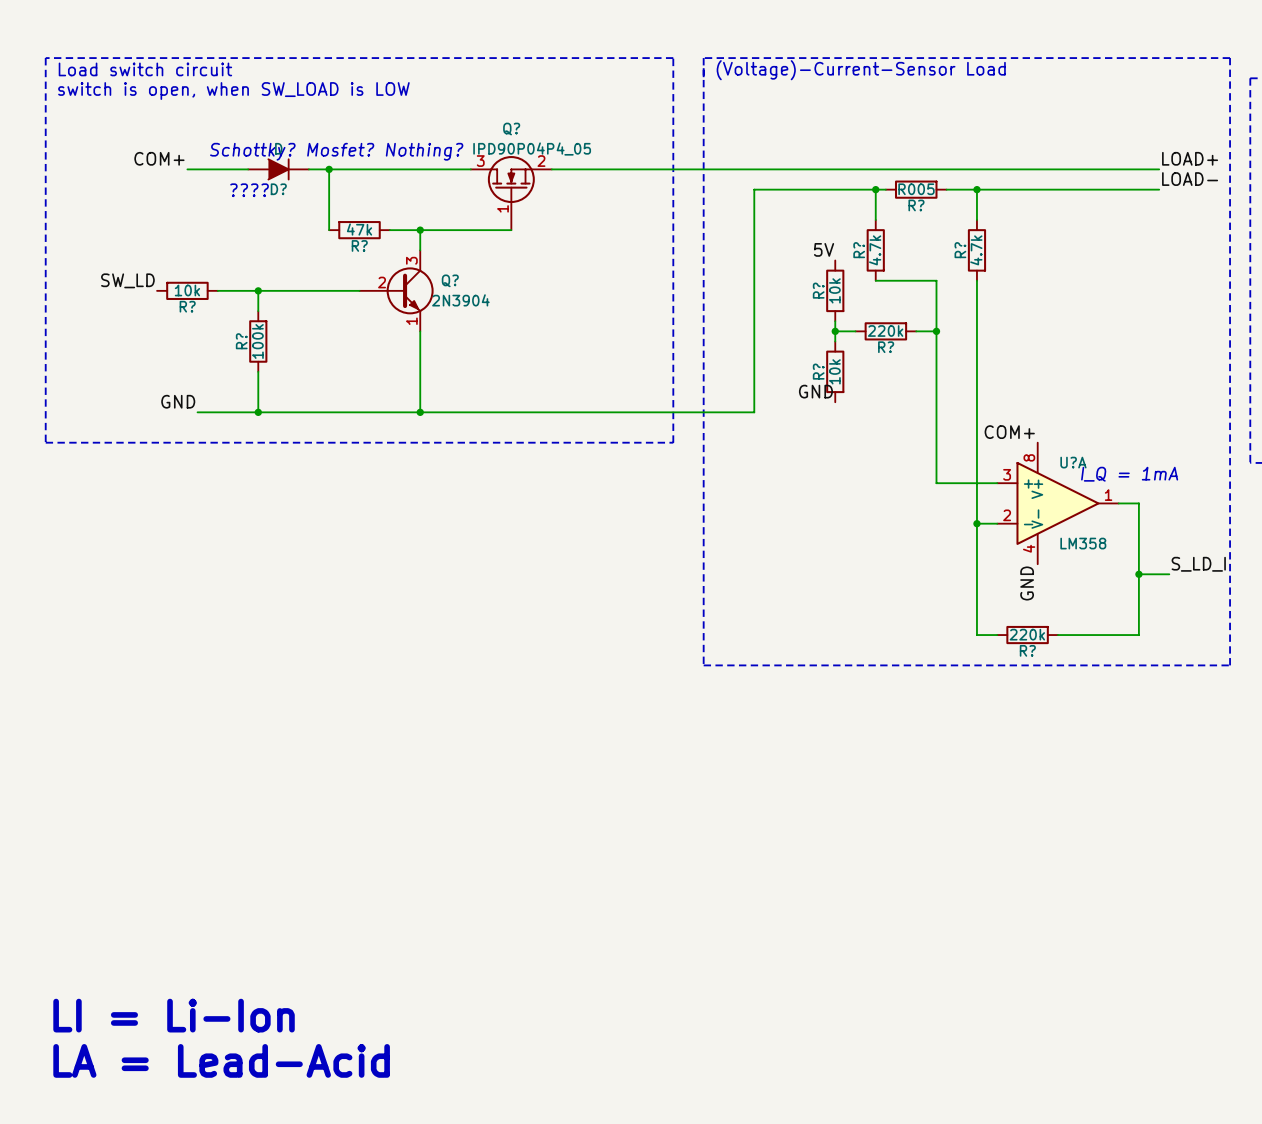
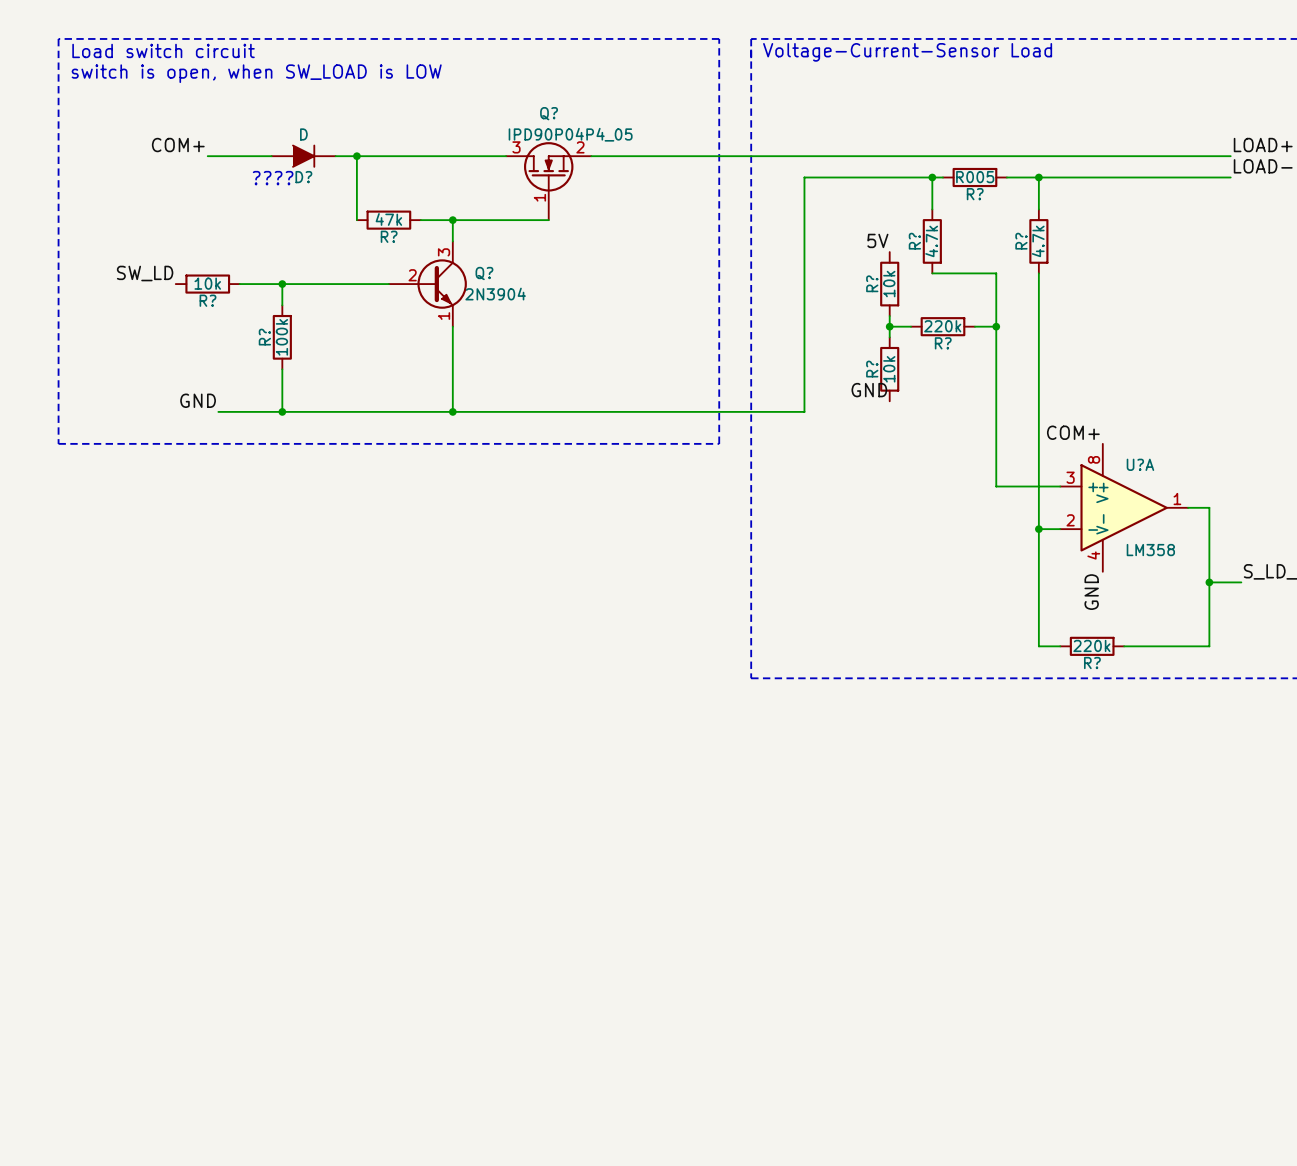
text: (Voltage)-Current-Sensor Load (861, 70) -> Voltage-Current-Sensor Load (907, 52)
text: Schottky? Mosfet? Nothing? (336, 151) -> none
text: I_Q = 1mA (1129, 474) -> none
text: LI = Li-Ion (174, 1015) -> none
text: LA = Lead-Acid (221, 1060) -> none

